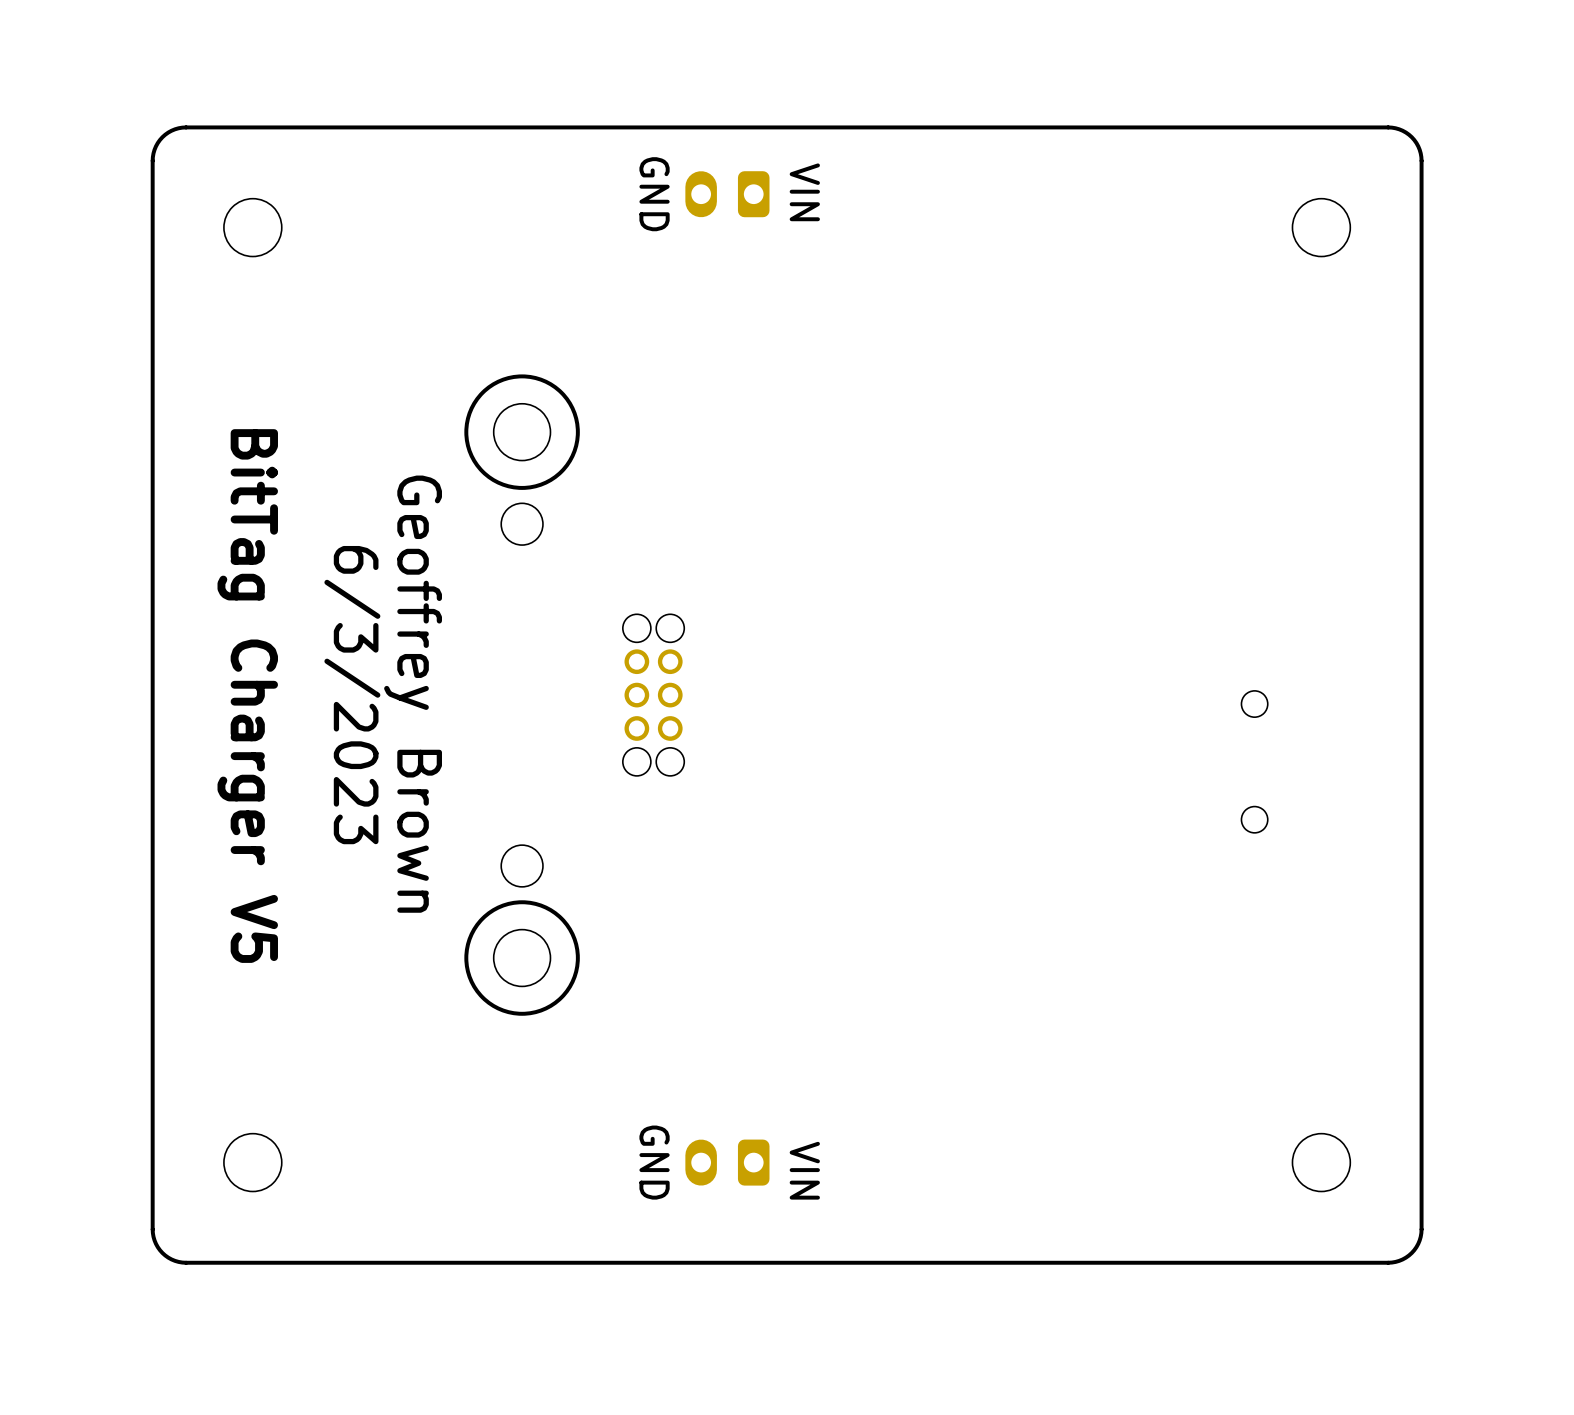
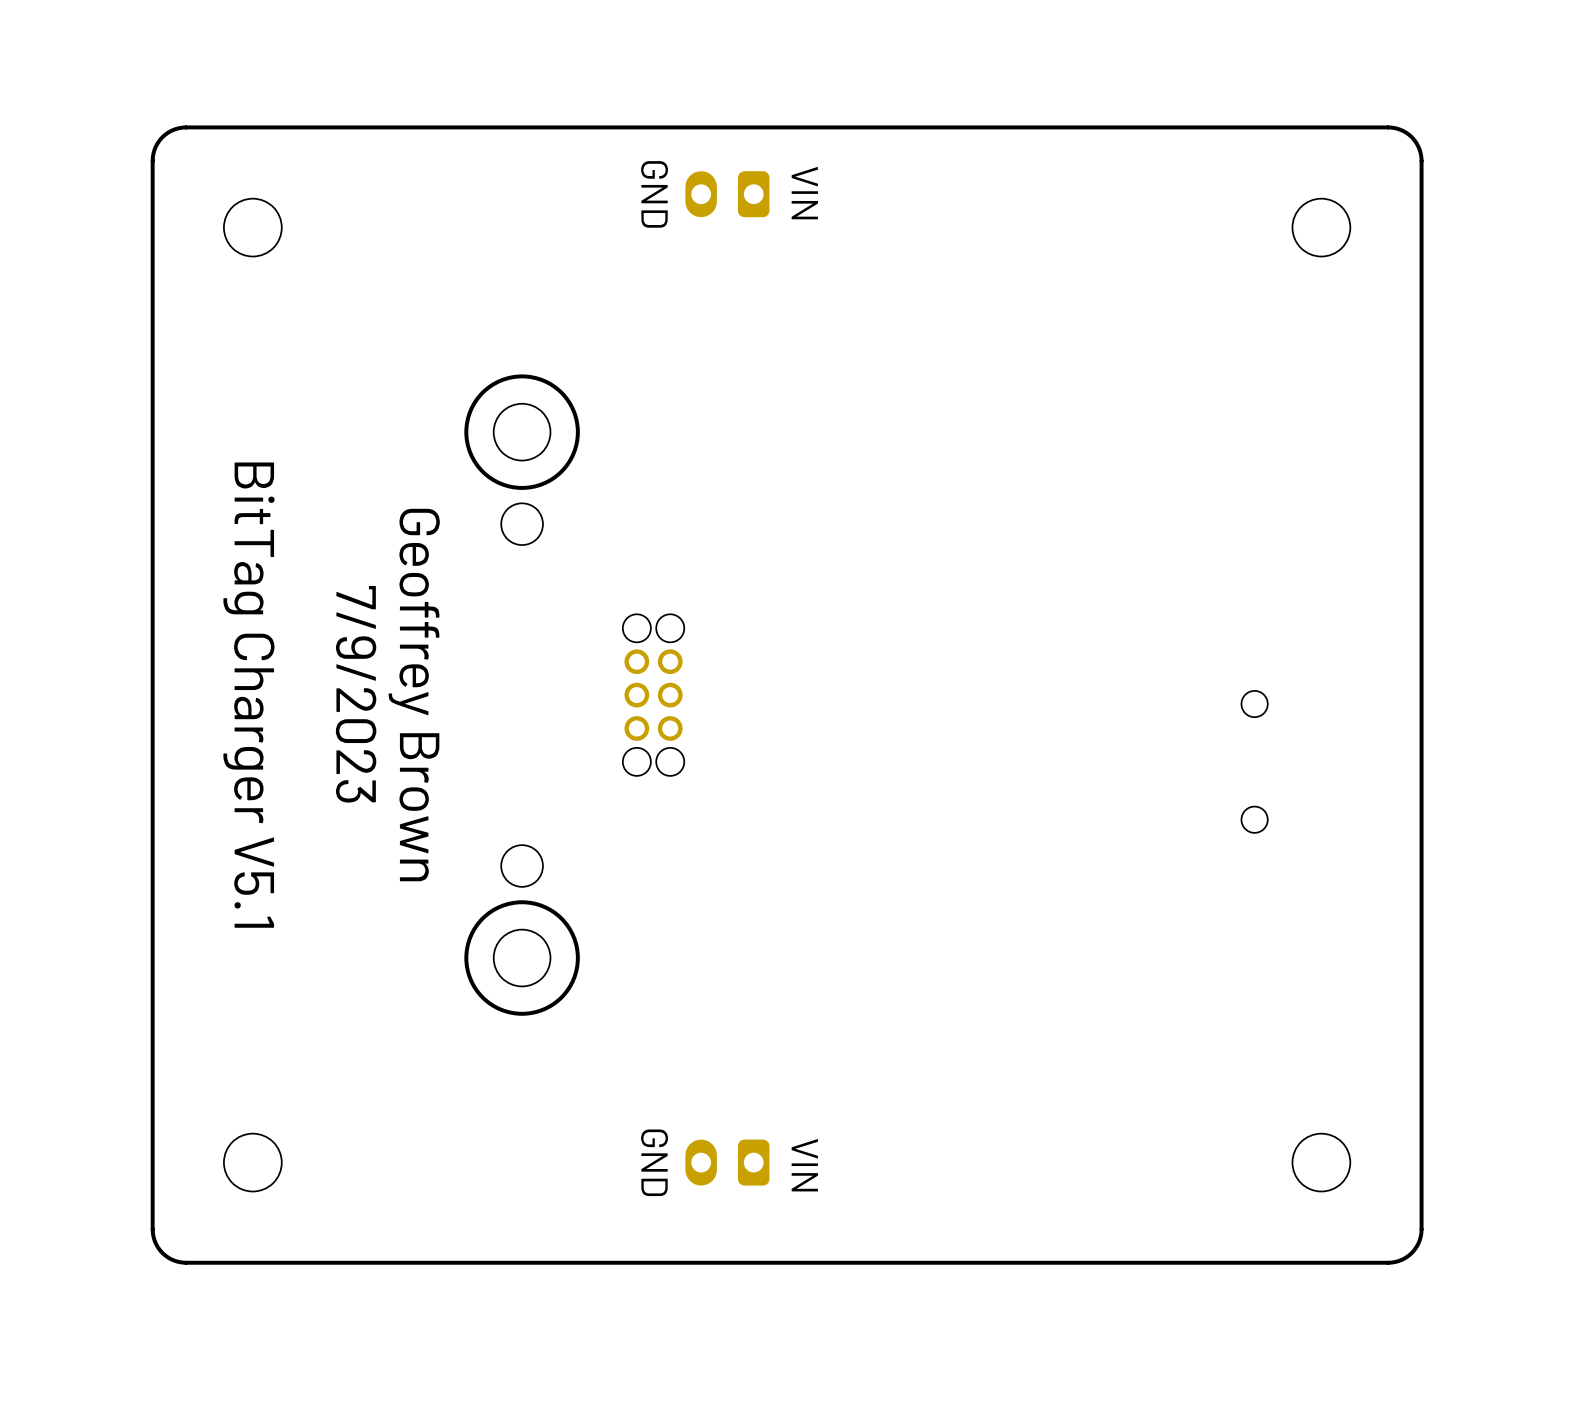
text: 6/3/2023 (352, 695) -> 7/9/2023 (356, 694)
text: BitTag Charger V5 (247, 696) -> BitTag Charger V5.1 (248, 695)

